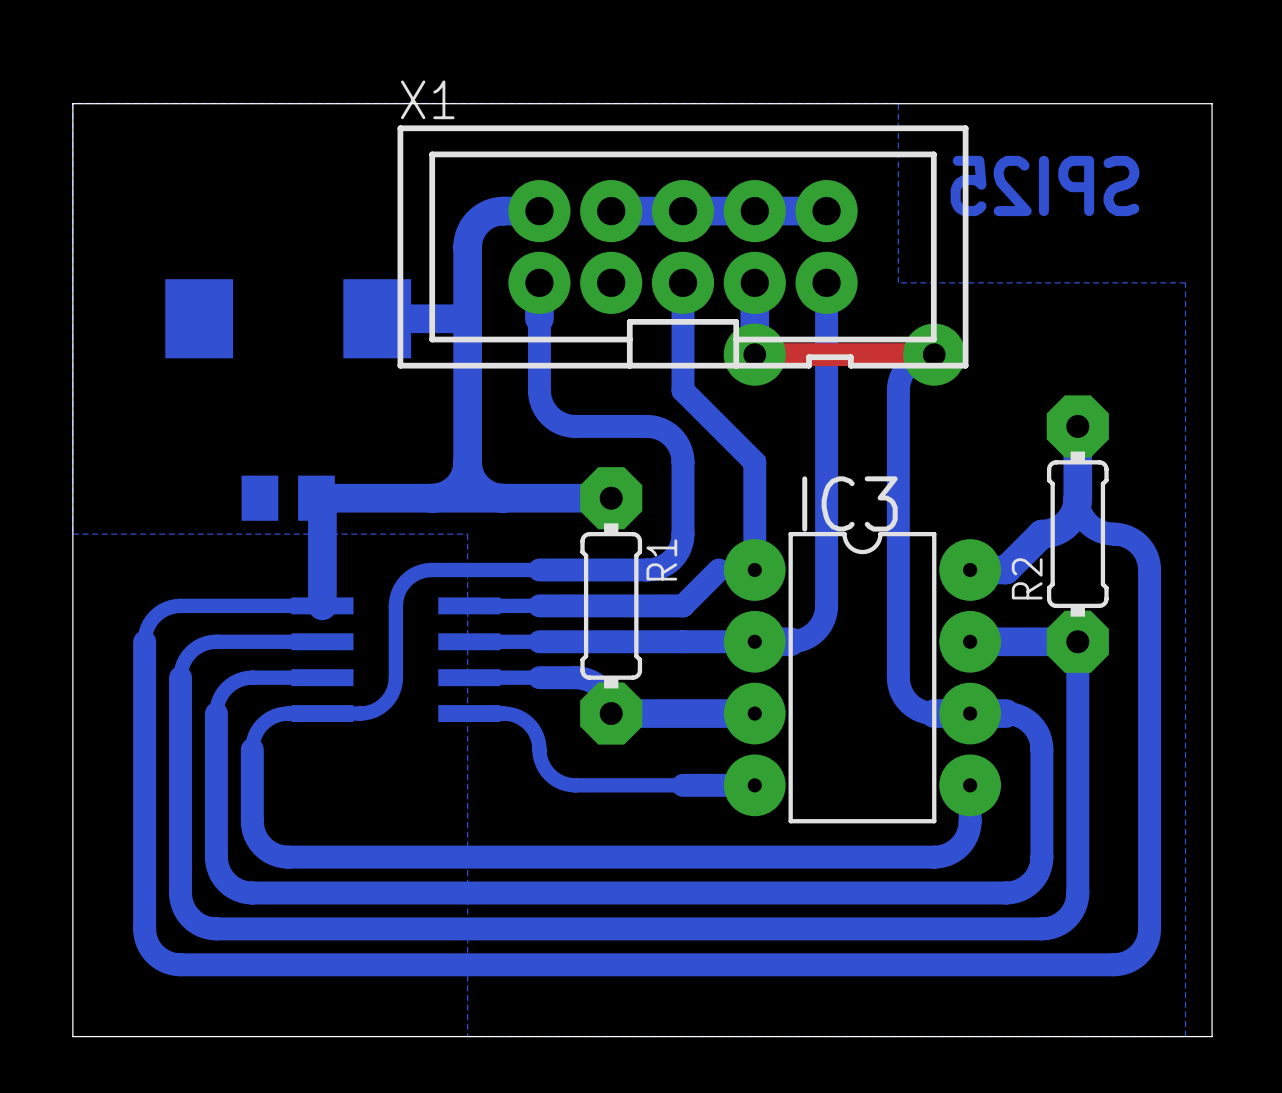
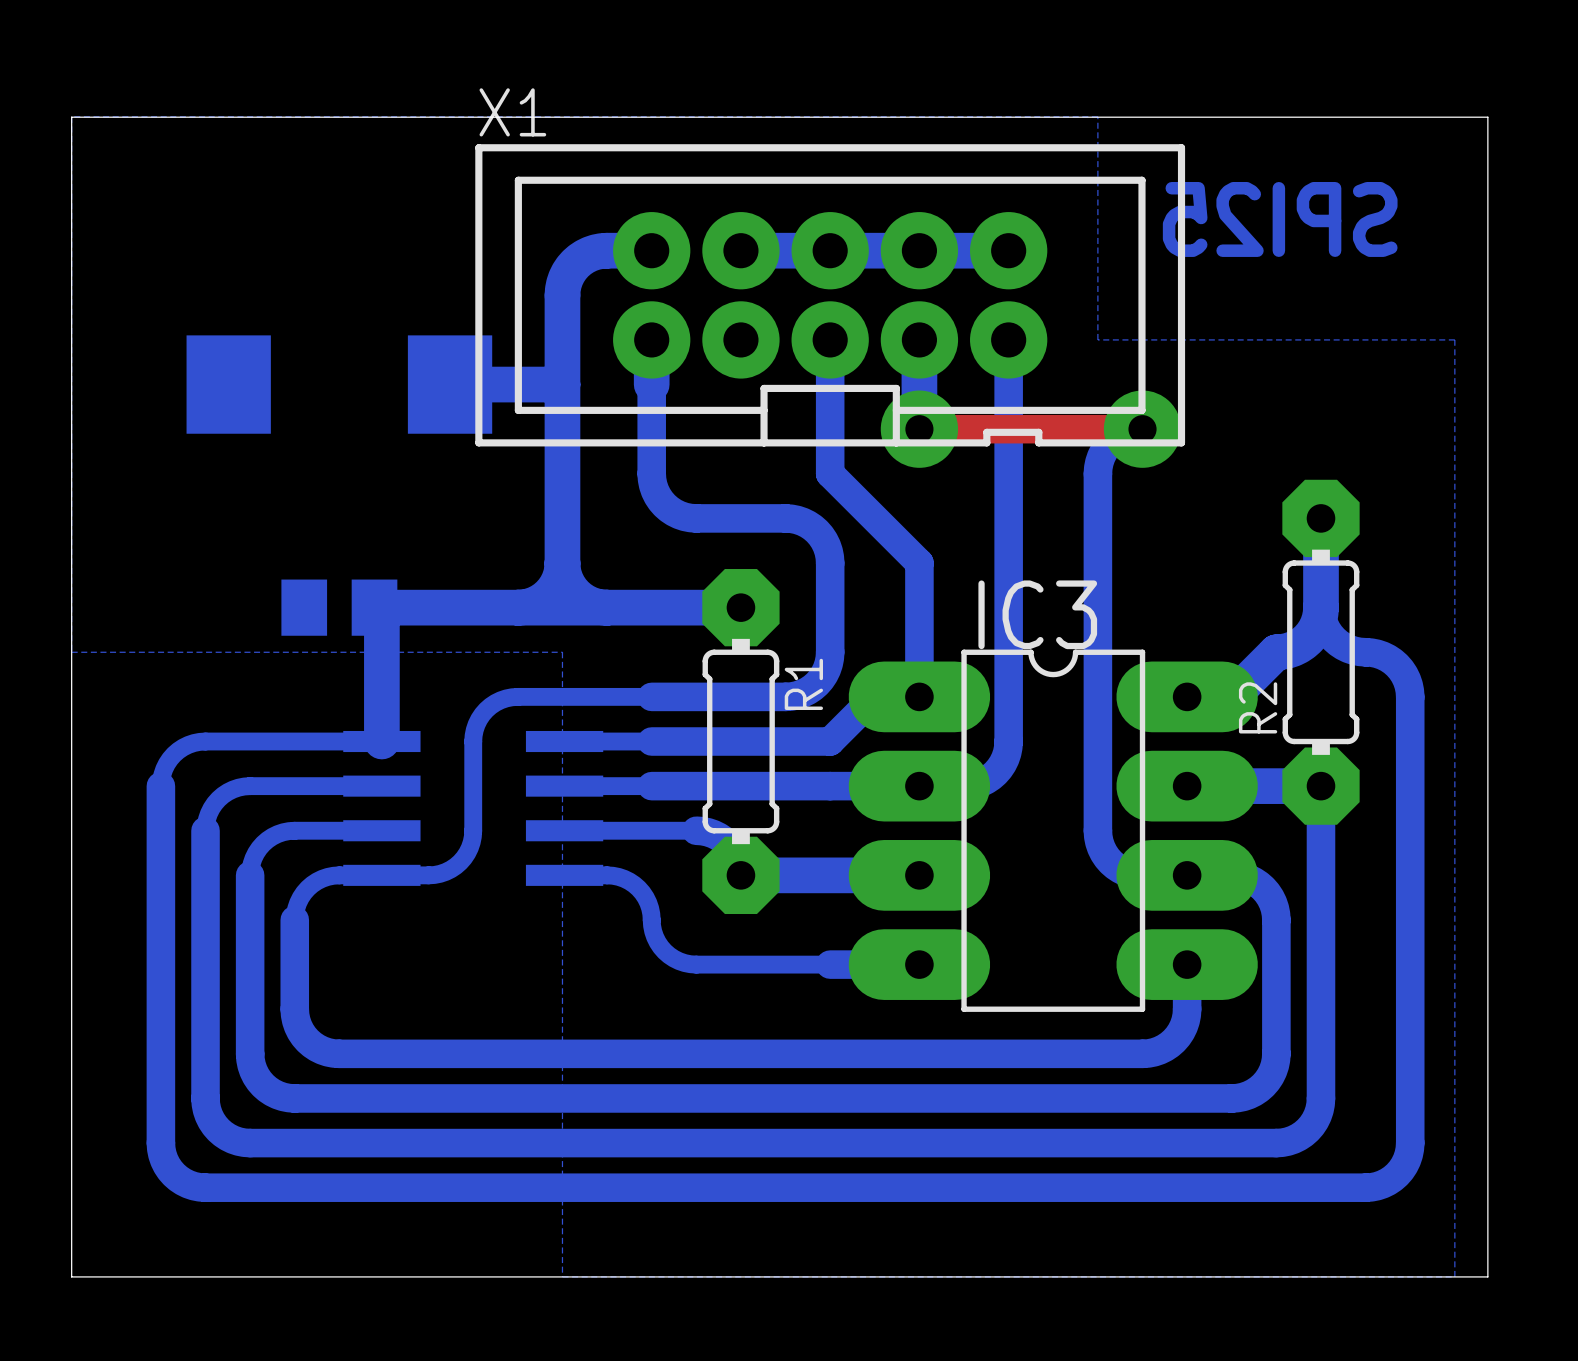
IC3 footprint: [723, 531, 1002, 824] -> [848, 649, 1258, 1012]
bottom track width: thick (539, 677) (575, 677) -> thin (651, 830) (696, 830)

